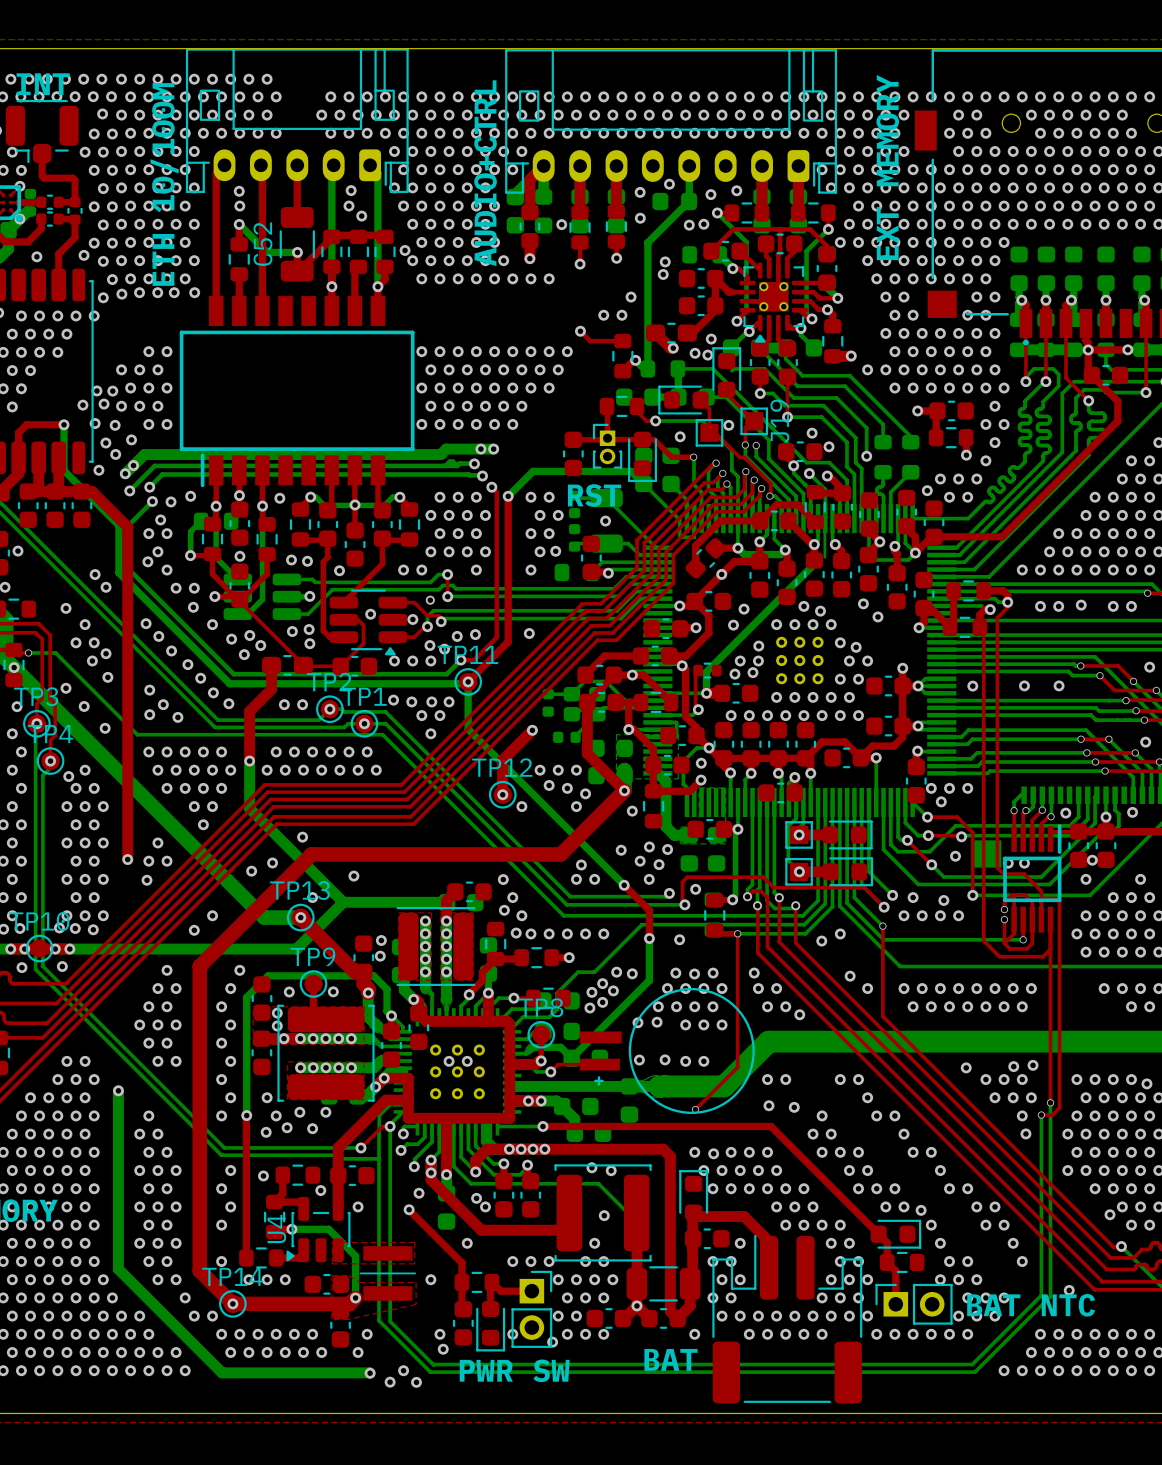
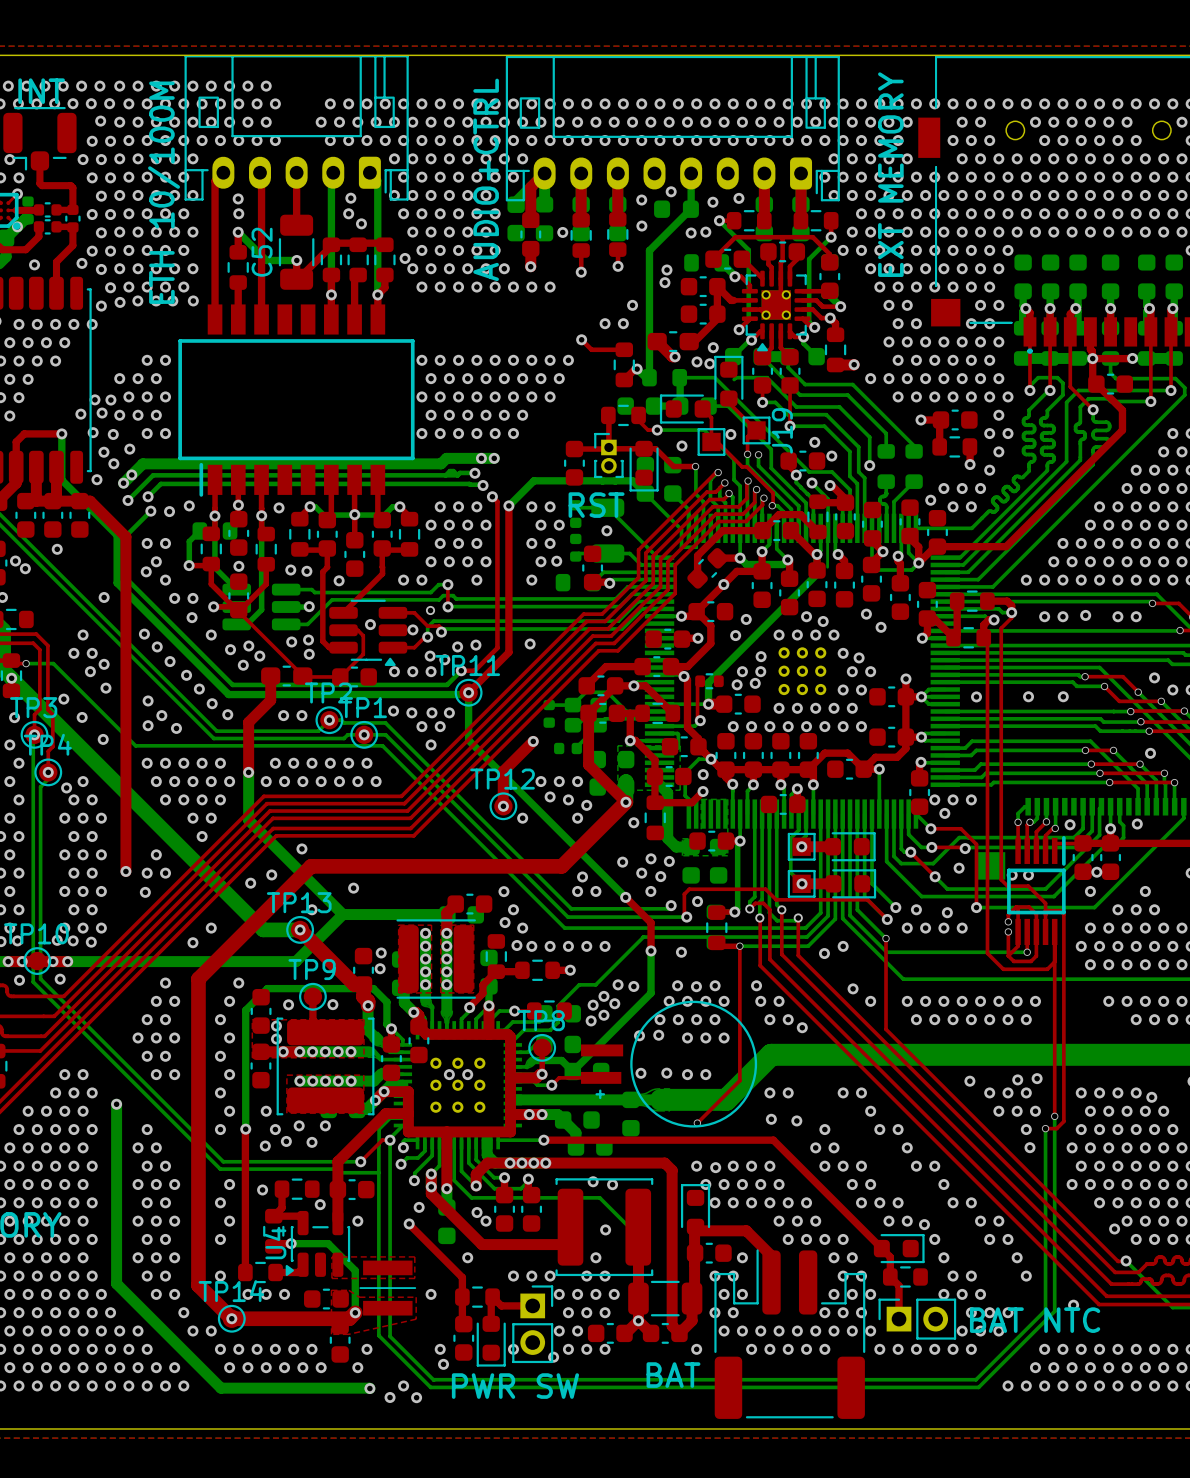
via: (160, 519) -> none
via: none -> (57, 549)
via: none -> (25, 568)
via: (95, 574) -> none
via: (66, 608) -> none

